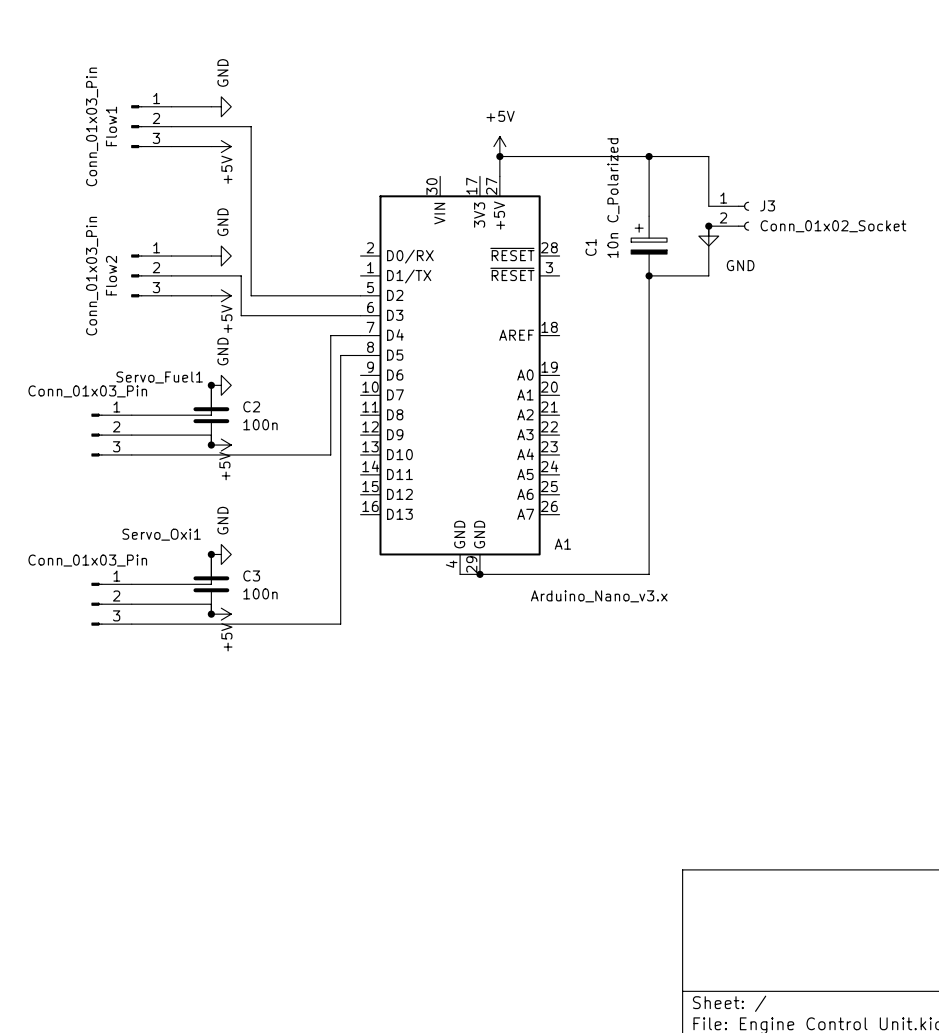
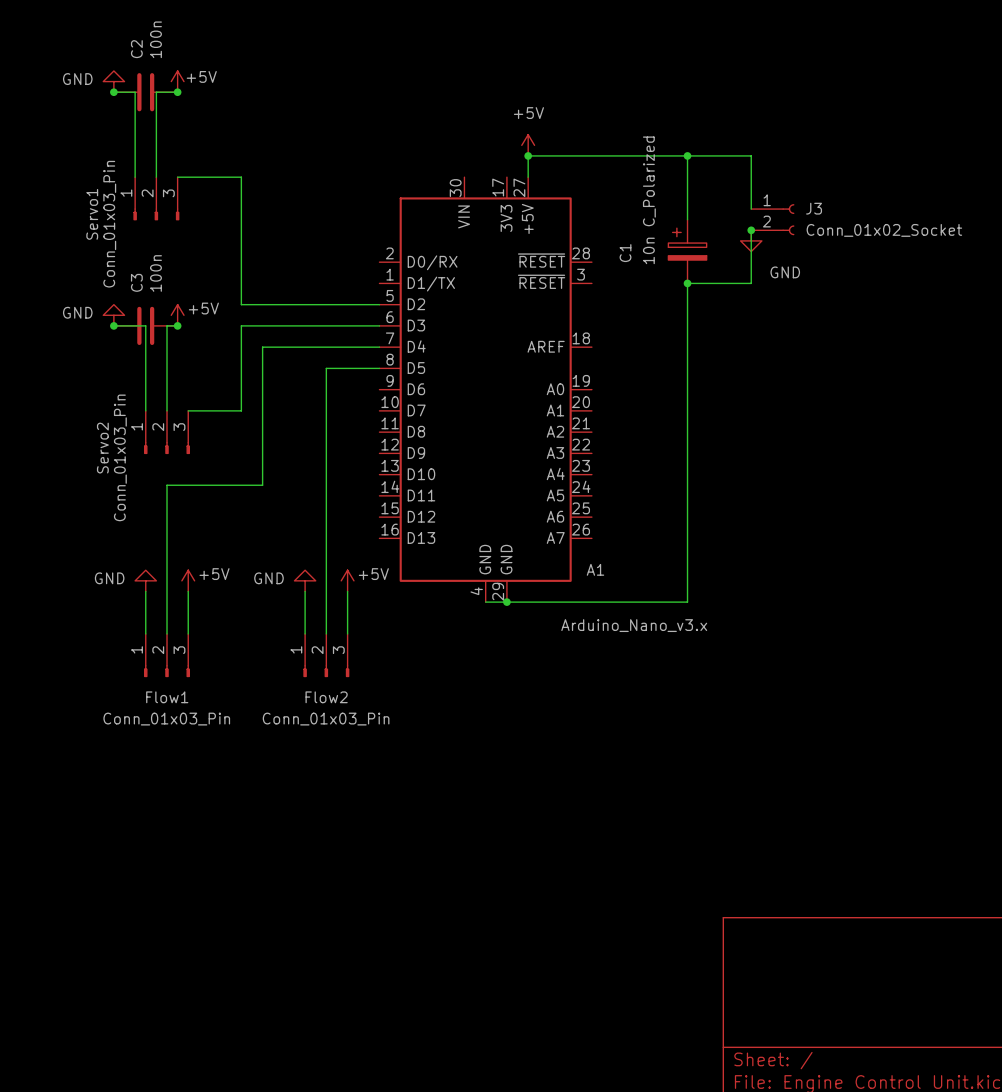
power symbol: none -> GND (113, 81)
wire: none -> (113, 92) (135, 92) (135, 177)
junction: none -> (113, 92)
wire: none -> (177, 92) (156, 92) (156, 177)
junction: none -> (177, 92)
wire: (171, 106) (211, 106) -> none
power symbol: GND (221, 106) -> none
Flow1 rotation: 0° (136, 126) -> 90° counterclockwise (167, 671)
Flow1 position: (151, 126) -> (167, 655)
wire: (171, 126) (251, 126) (251, 295) -> (177, 177) (241, 177) (241, 304) (262, 304)
wire: (171, 146) (211, 146) -> none
power symbol rotation: 0° (221, 146) -> 90° counterclockwise (177, 81)
power symbol position: +5V (221, 146) -> +5V (177, 81)
Servo1: none -> Conn_01x03_Pin (156, 198)
wire: (171, 256) (211, 256) -> none
power symbol: GND (221, 256) -> none
Flow2 rotation: 0° (136, 275) -> 90° counterclockwise (326, 671)
Flow2 position: (151, 275) -> (326, 655)
wire: (171, 275) (241, 275) (241, 315) -> (188, 410) (241, 410) (241, 325) (251, 325)
wire: (171, 295) (211, 295) -> none
power symbol rotation: 0° (221, 295) -> 90° counterclockwise (177, 315)
power symbol position: +5V (221, 295) -> +5V (177, 315)
power symbol: none -> GND (113, 315)
wire: none -> (113, 325) (145, 325) (145, 410)
junction: none -> (113, 325)
wire: none -> (177, 325) (167, 325) (167, 410)
junction: none -> (177, 325)
wire: (330, 335) (330, 454) (131, 454) -> (347, 347) (262, 347) (262, 485) (167, 485) (167, 633)
wire: (340, 355) (340, 624) (131, 624) -> (358, 368) (326, 368) (326, 633)
wire: (211, 385) (211, 415) (131, 415) -> none
junction: (211, 385) -> none
power symbol: GND (221, 385) -> none
C2 name position: C2 (251, 406) -> C2 (136, 49)
Servo2: none -> Conn_01x03_Pin (167, 432)
C2 rotation: 0° (211, 415) -> 90° clockwise (145, 92)
C2 position: (211, 415) -> (145, 92)
C2 value position: 100n (260, 424) -> 100n (155, 39)
Servo_Fuel1: Conn_01x03_Pin (111, 435) -> none
wire: (131, 435) (211, 435) (211, 445) -> none
junction: (211, 445) -> none
power symbol: +5V (221, 445) -> none
power symbol: none -> GND (145, 580)
power symbol: none -> +5V (188, 580)
wire: (211, 554) (211, 584) (131, 584) -> none
junction: (211, 554) -> none
power symbol: GND (221, 554) -> none
power symbol: none -> GND (305, 580)
power symbol: none -> +5V (347, 580)
wire: none -> (145, 591) (145, 633)
wire: none -> (188, 591) (188, 633)
wire: none -> (305, 591) (305, 633)
wire: none -> (347, 591) (347, 633)
C3 name position: C3 (251, 575) -> C3 (136, 282)
C3 rotation: 0° (211, 584) -> 90° clockwise (145, 325)
C3 position: (211, 584) -> (145, 325)
C3 value position: 100n (260, 593) -> 100n (155, 273)
Servo_Oxi1: Conn_01x03_Pin (111, 604) -> none
wire: (131, 604) (211, 604) (211, 614) -> none
junction: (211, 614) -> none
power symbol: +5V (221, 614) -> none

